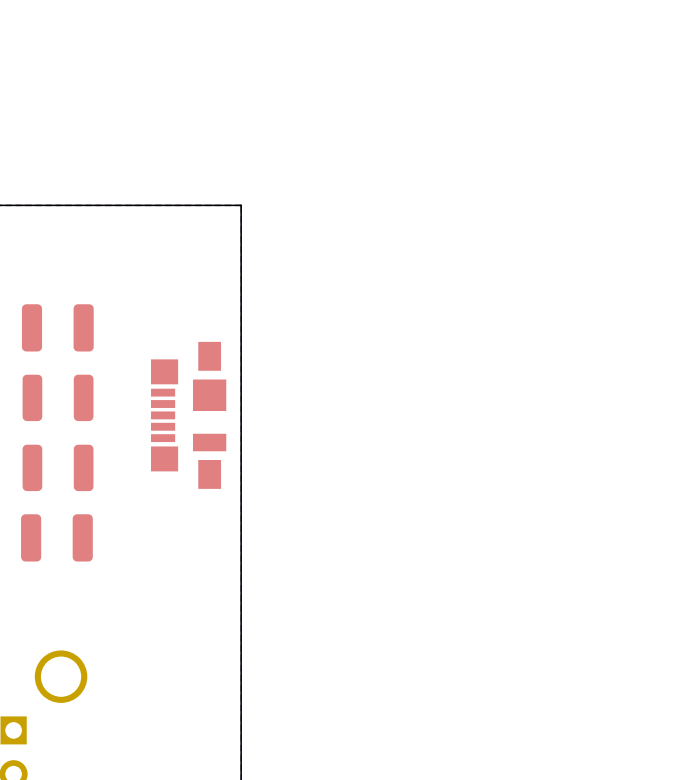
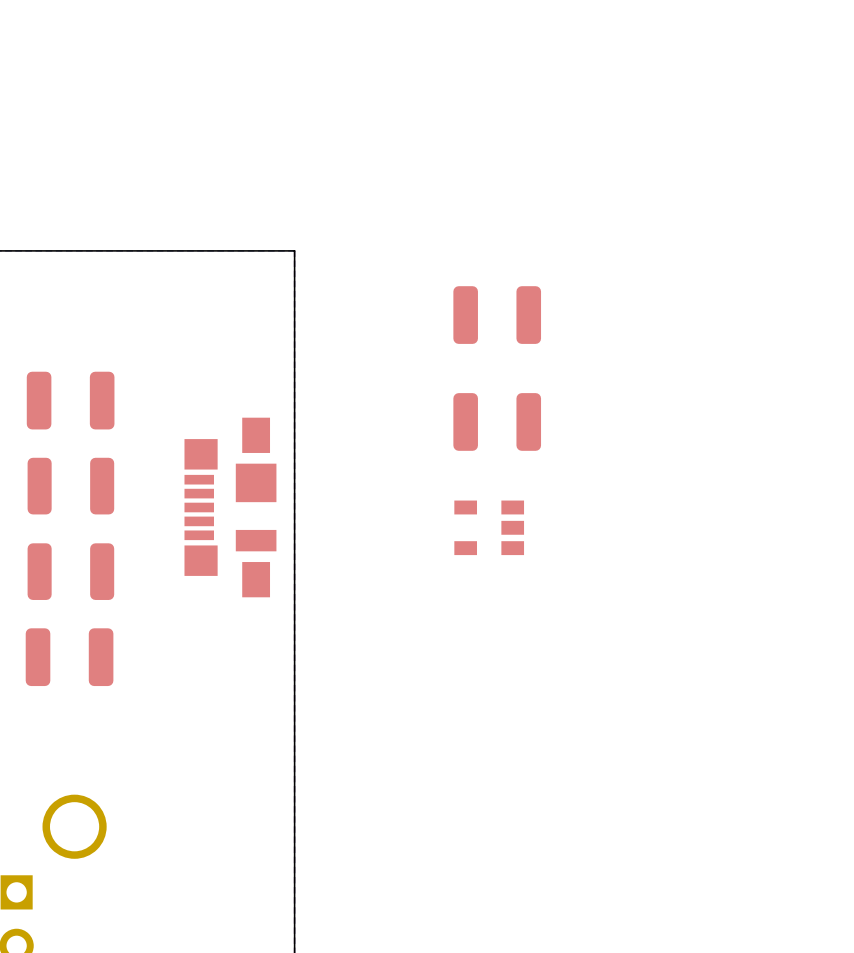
part: none -> (497, 315)
part: none -> (497, 421)
part: none -> (489, 527)

